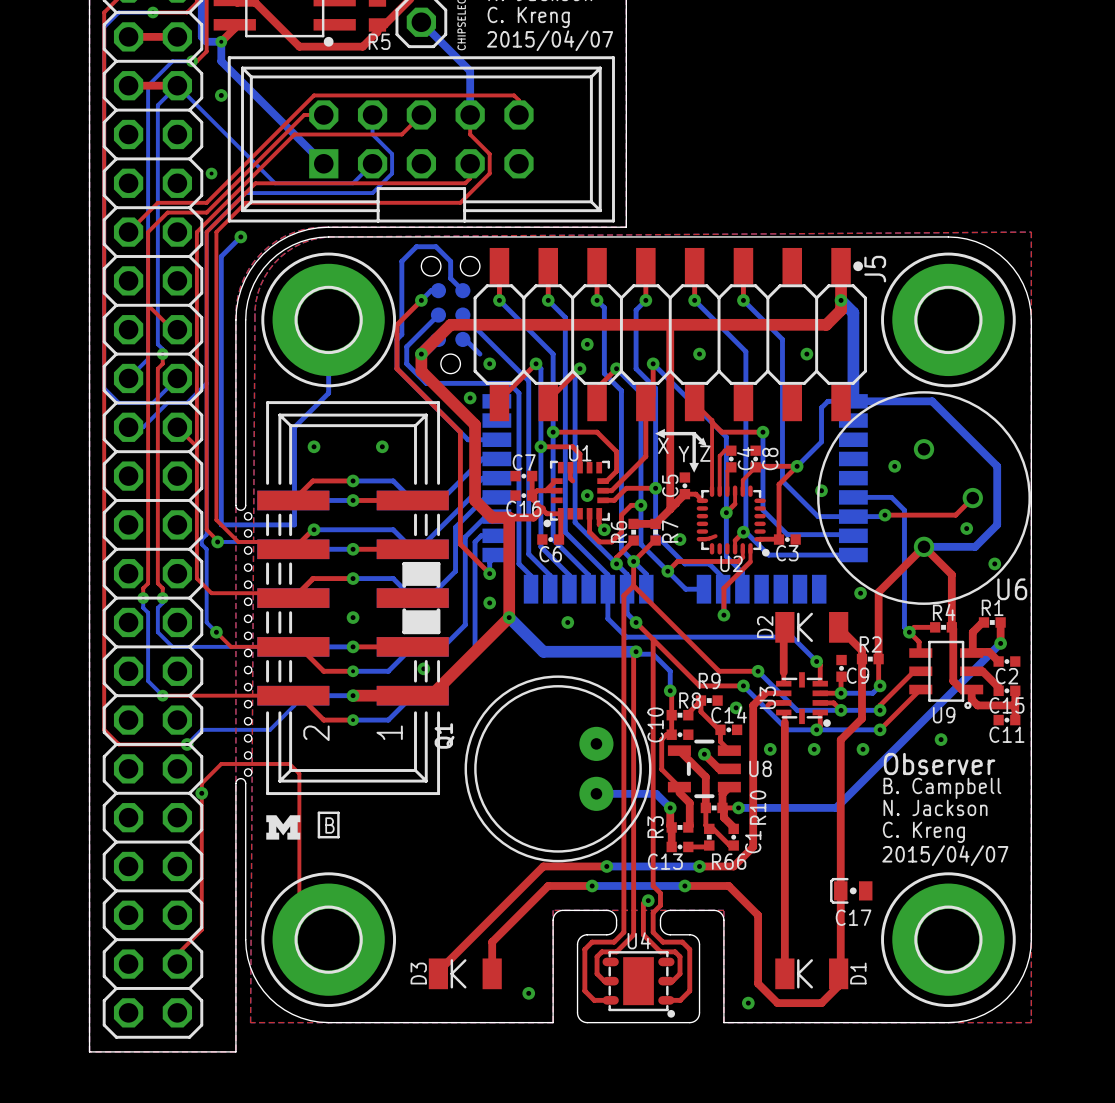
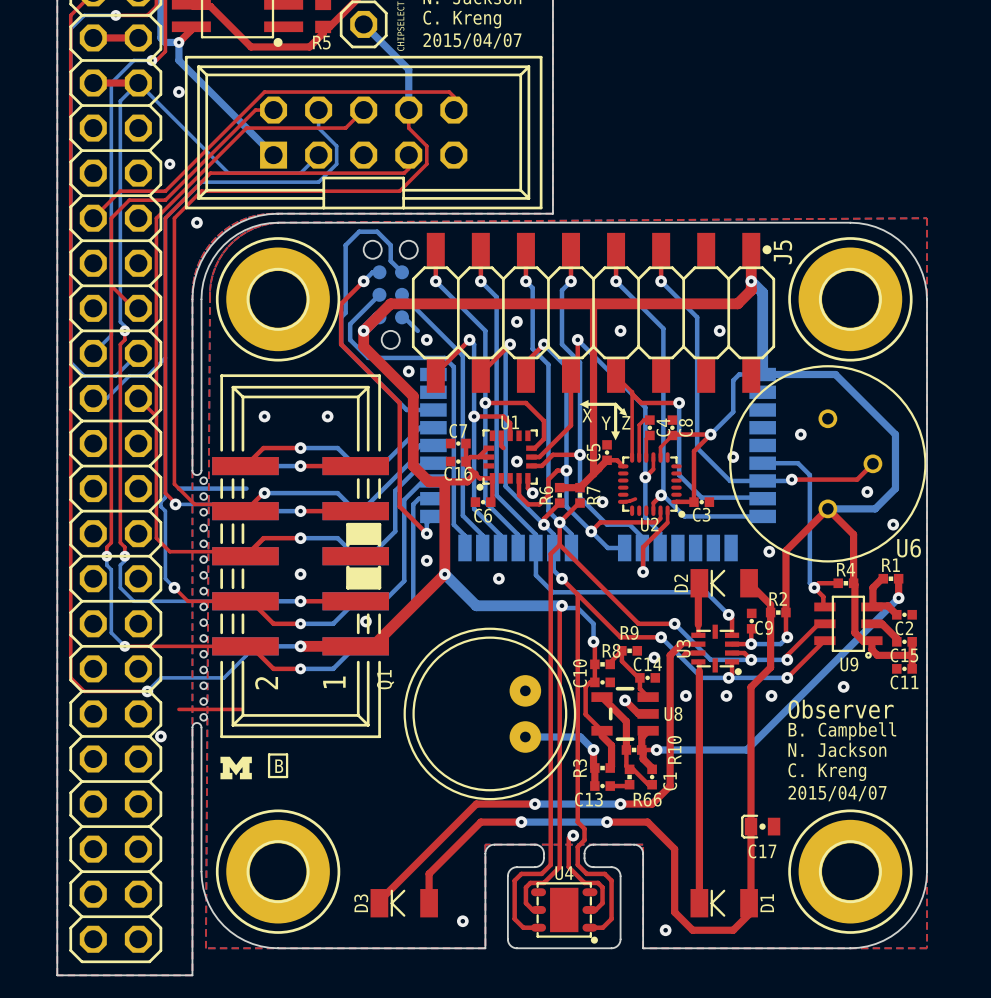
bottom track: (240, 236) (221, 256) (221, 524) -> none
bottom track: (328, 319) (328, 393) (294, 427) (294, 524) -> none
top track: (221, 763) (201, 783) (201, 929) (177, 954) -> none
top track: (289, 763) (299, 773) (299, 910) (328, 939) -> none

